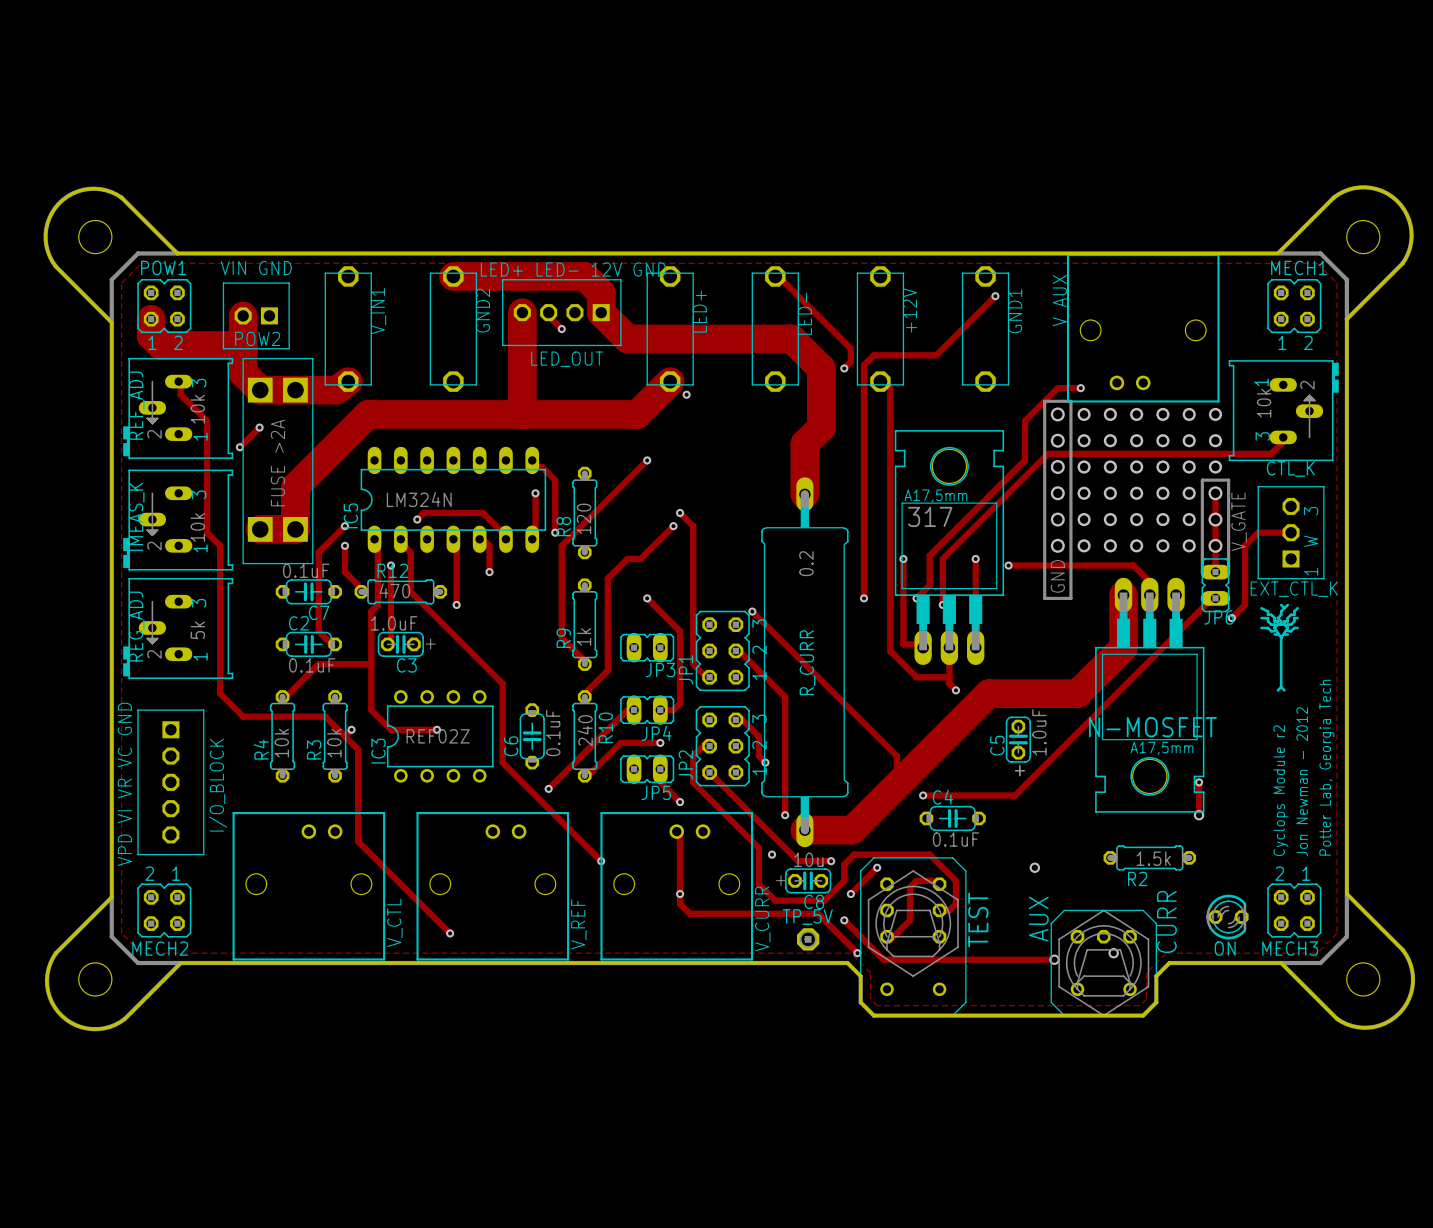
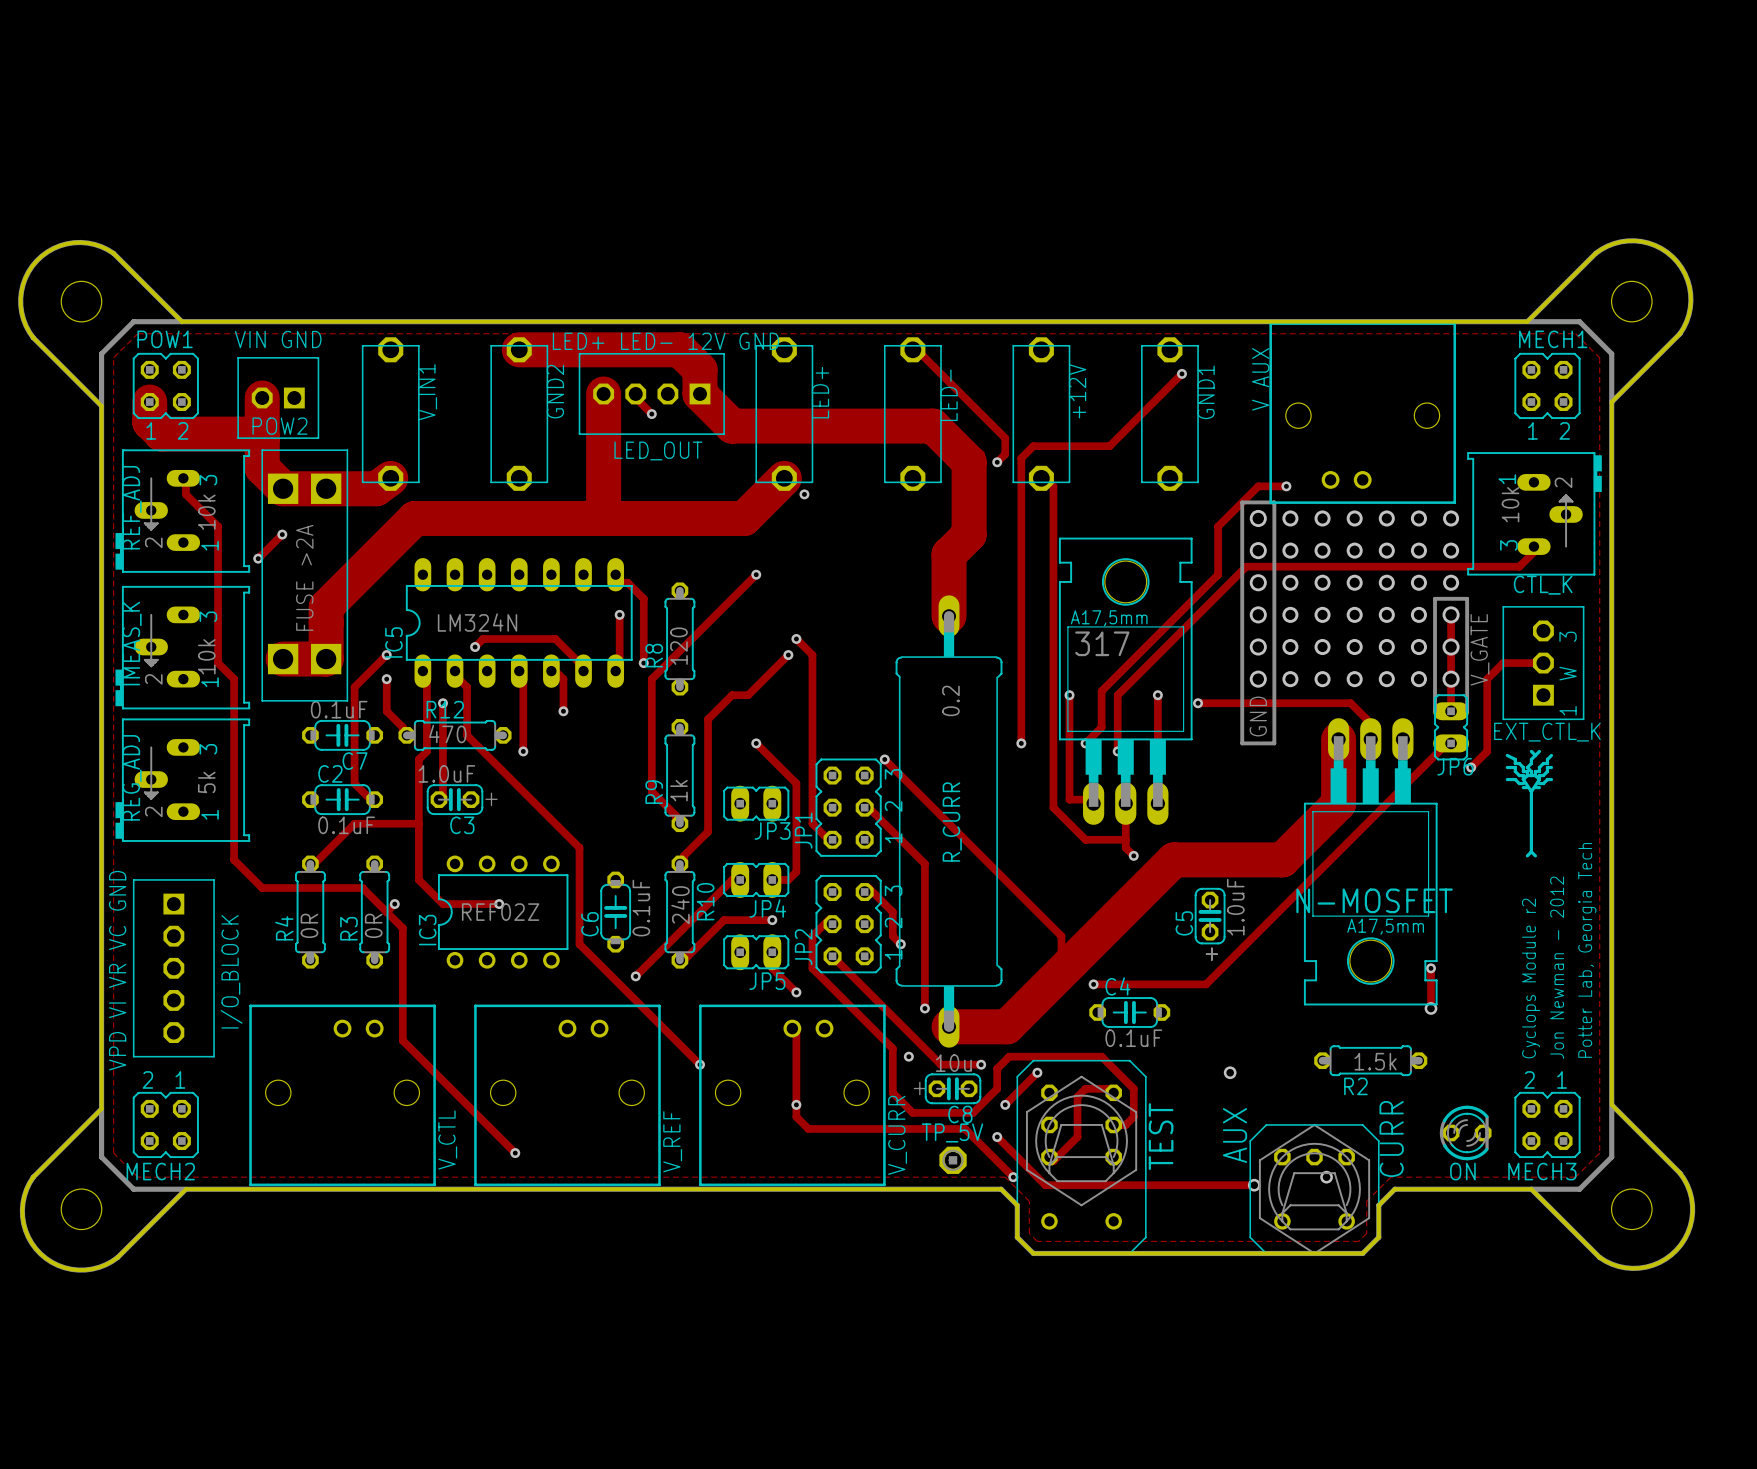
R4 value: 10k (281, 743) -> 0R (309, 925)
R3 value: 10k (334, 743) -> 0R (373, 925)

